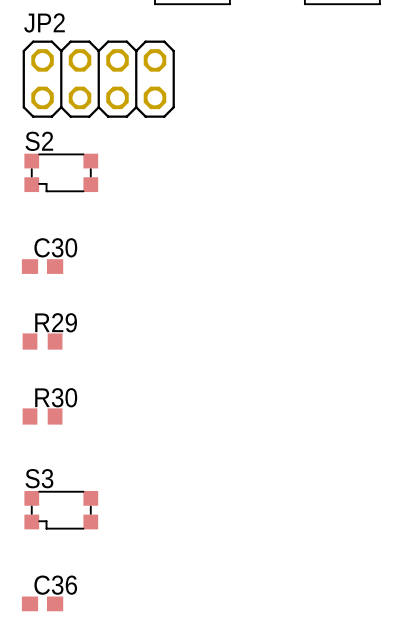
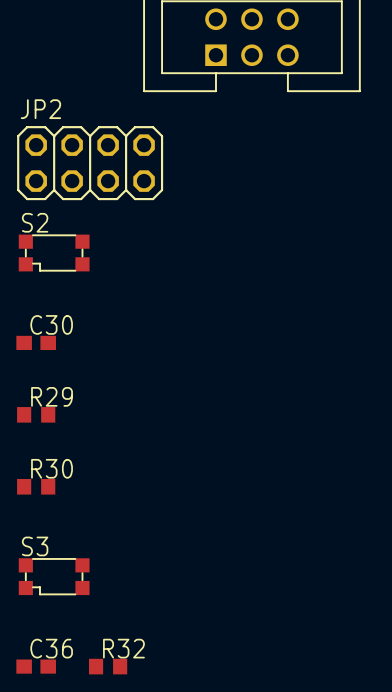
R32: none -> (108, 666)

